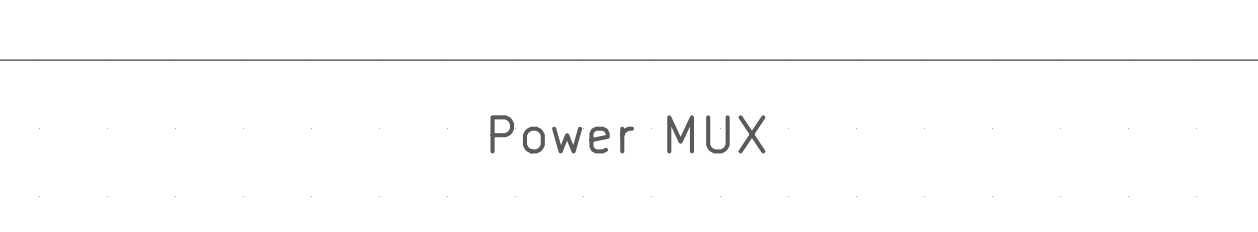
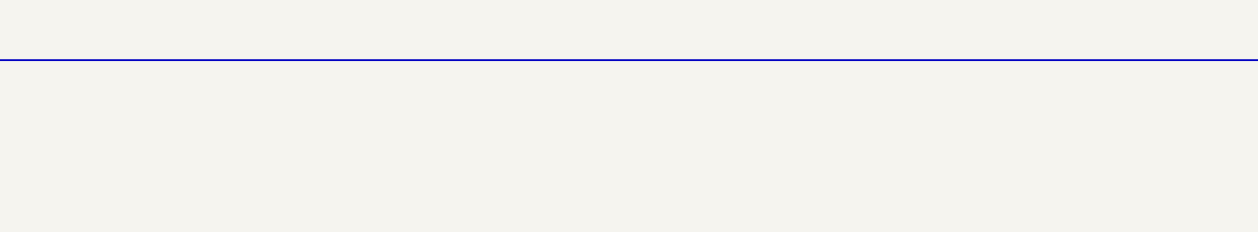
text: Power MUX (627, 134) -> none

